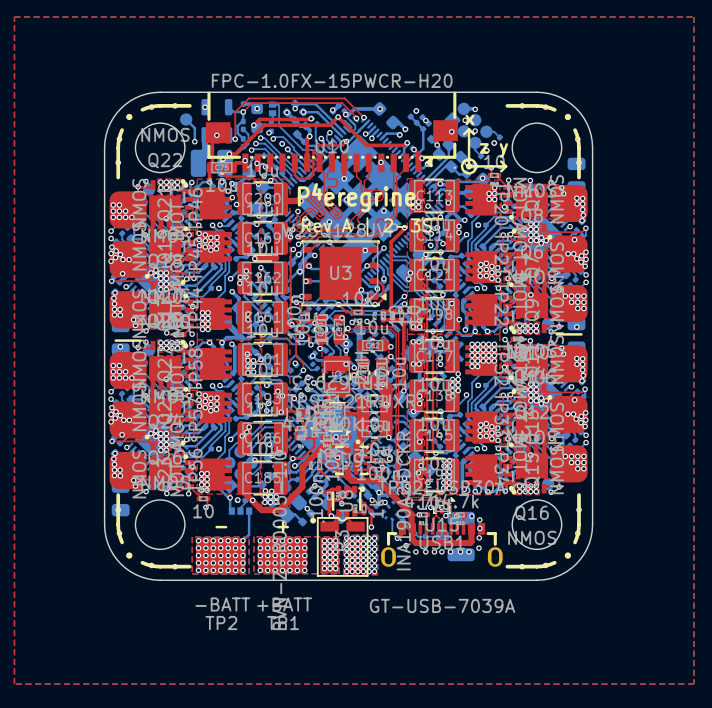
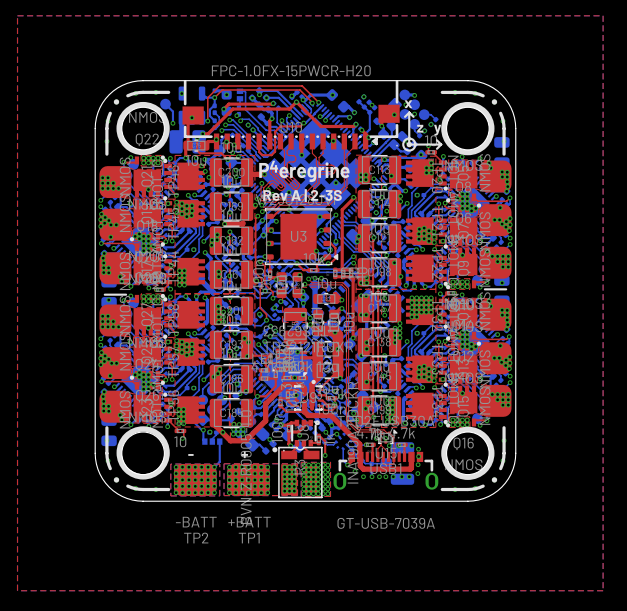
drawing: none -> [116, 101, 170, 156]
drawing: none -> [441, 102, 495, 156]
drawing: none -> [116, 426, 170, 480]
drawing: none -> [441, 426, 495, 480]

